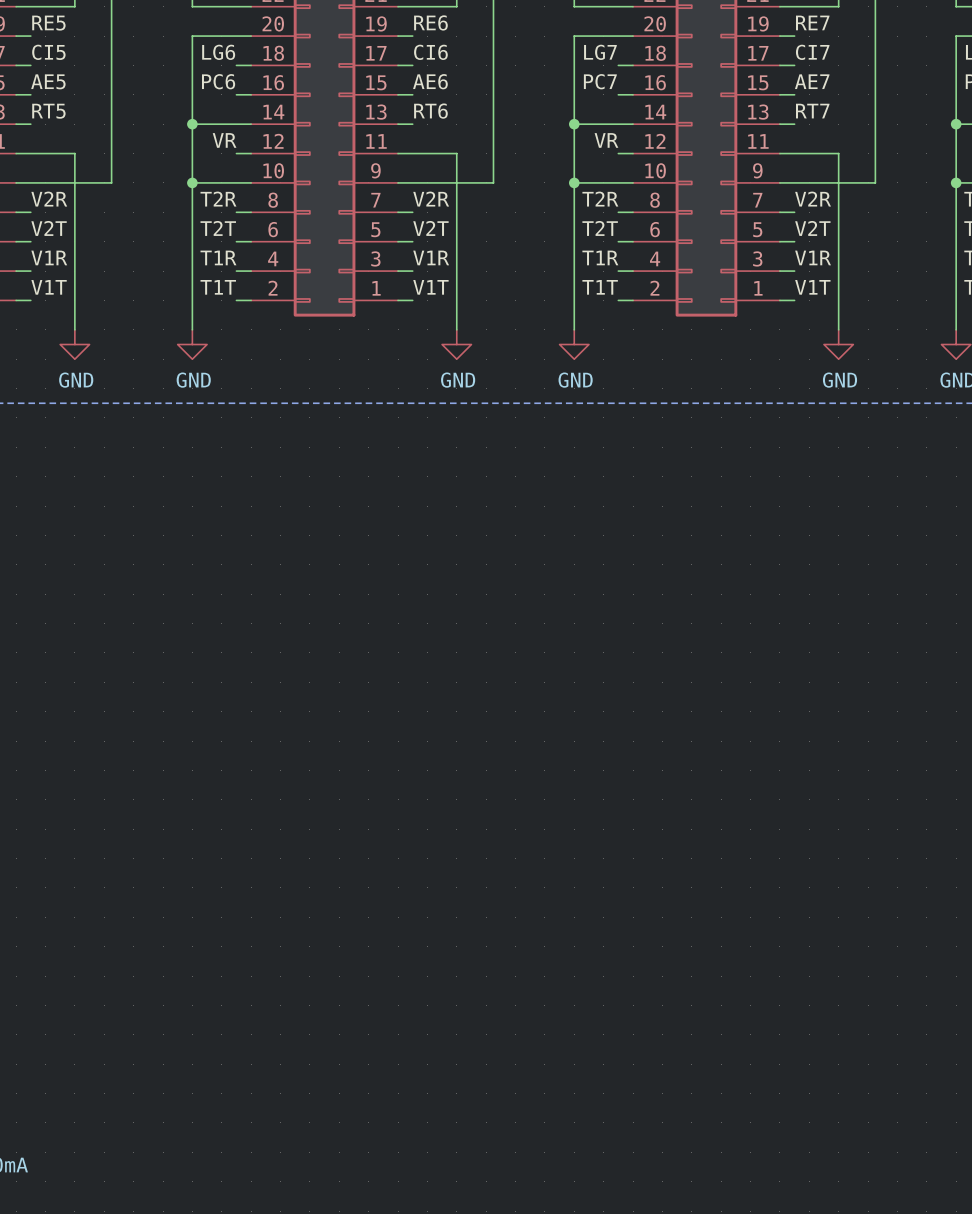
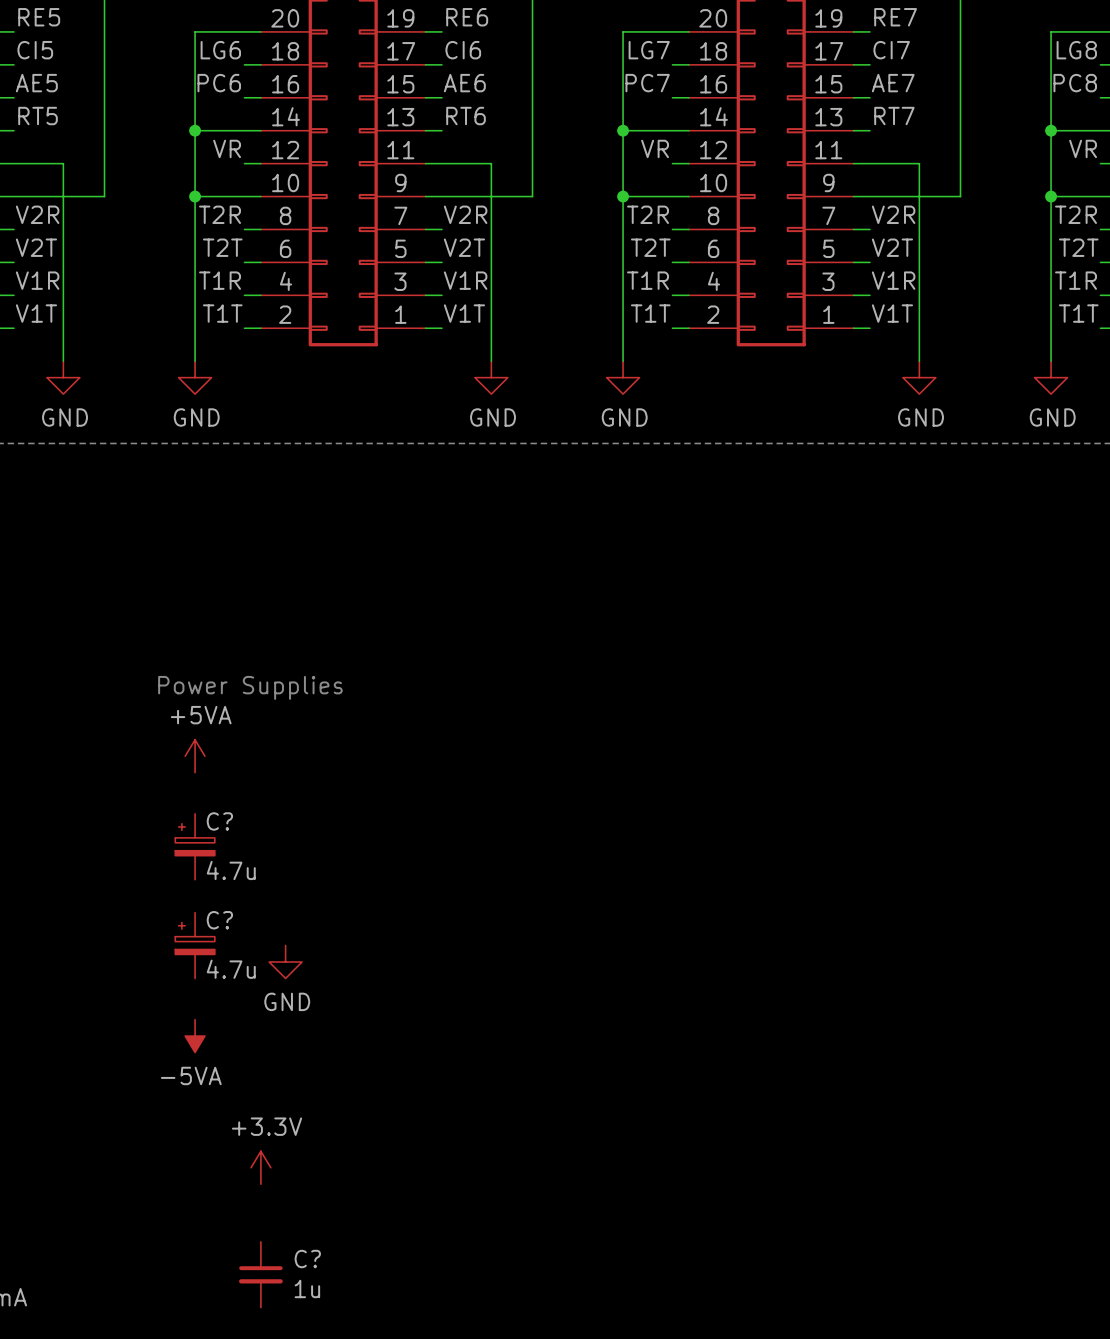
text: none -> Power Supplies (250, 687)
power symbol: none -> +5VA (195, 756)
C?: none -> 4.7u (195, 846)
C?: none -> 4.7u (195, 945)
power symbol: none -> GND (285, 962)
power symbol: none -> -5VA (195, 1036)
power symbol: none -> +3.3V (260, 1167)
C?: none -> 1u (260, 1274)

